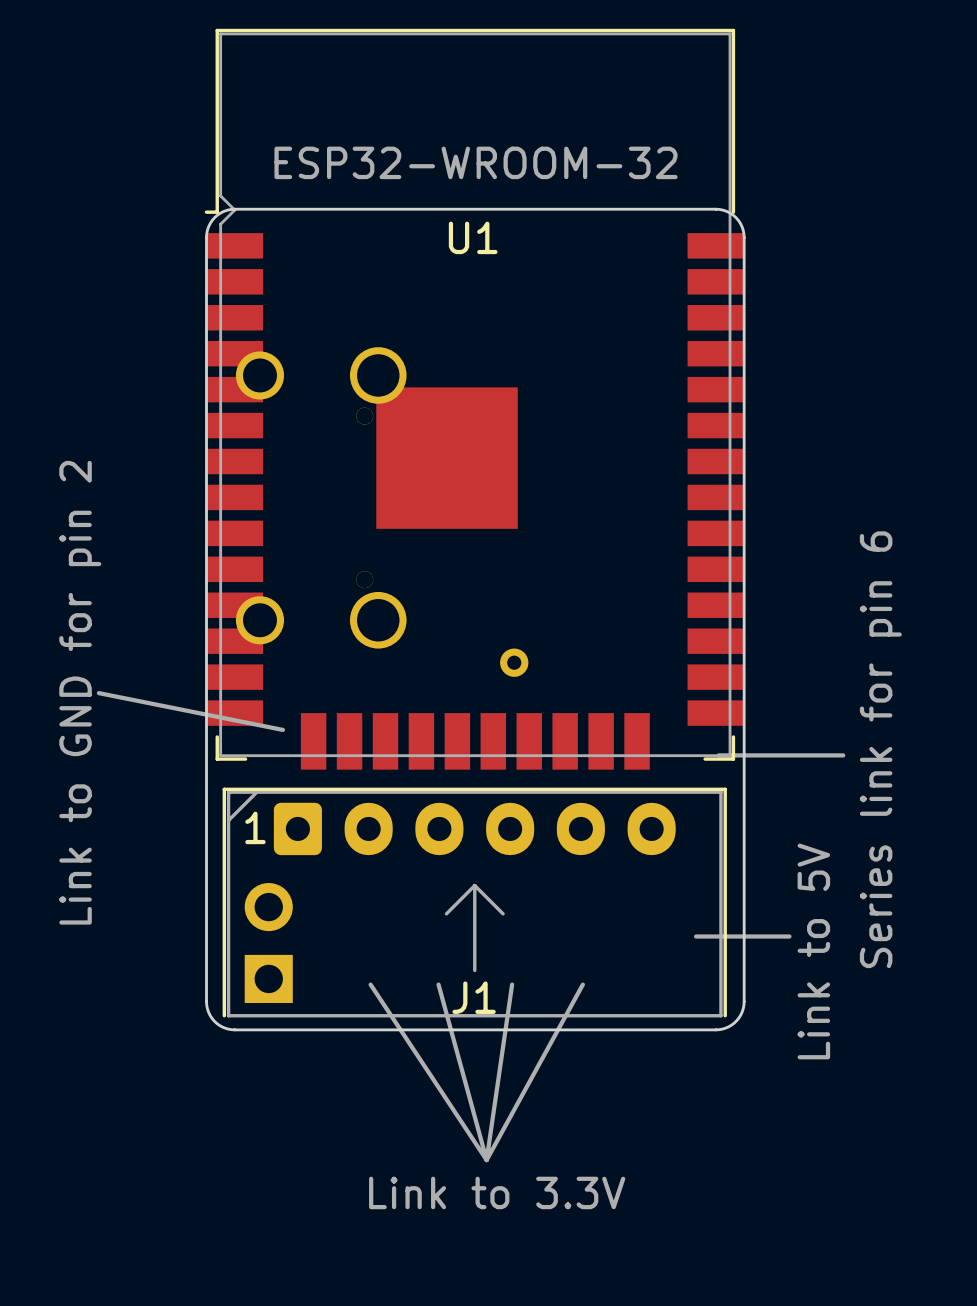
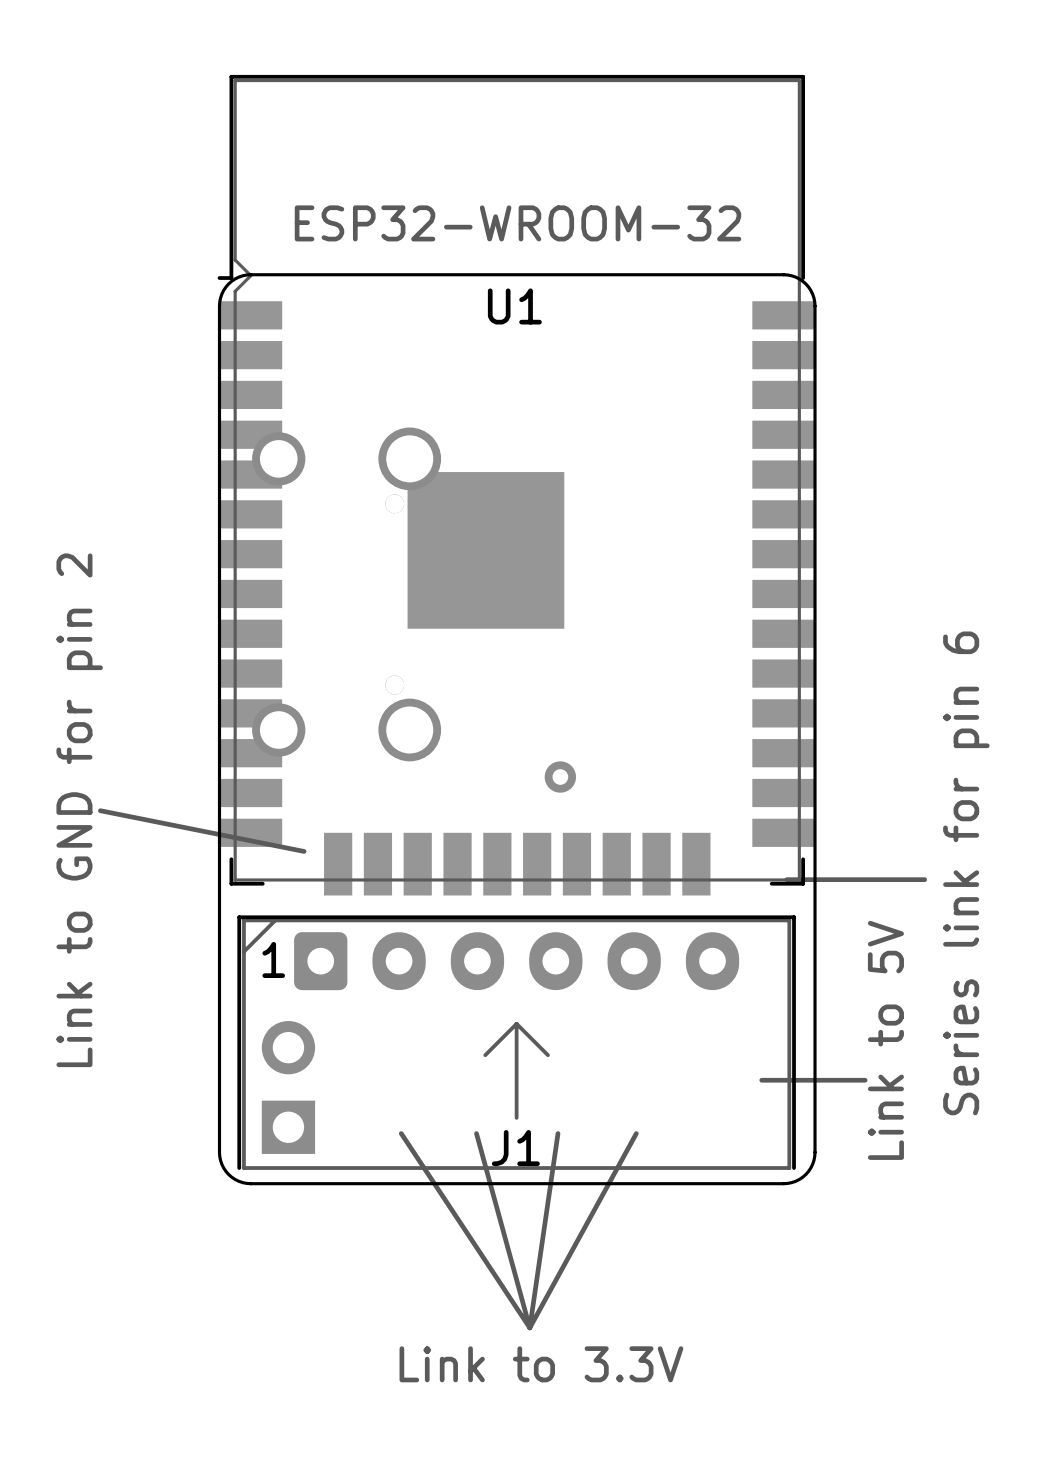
text position: Link to 5V (813, 951) -> Link to 5V (885, 1040)

